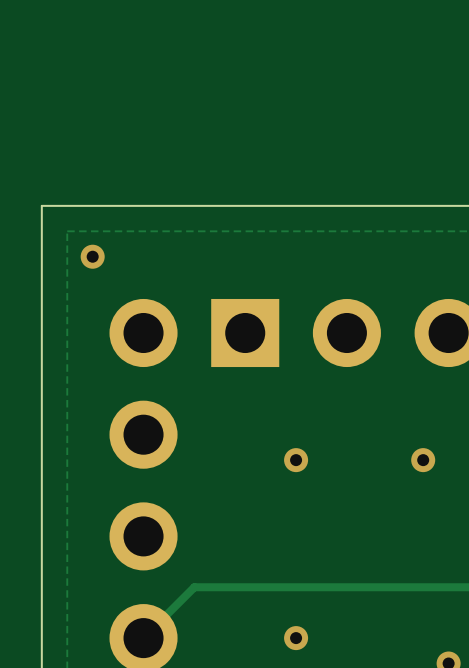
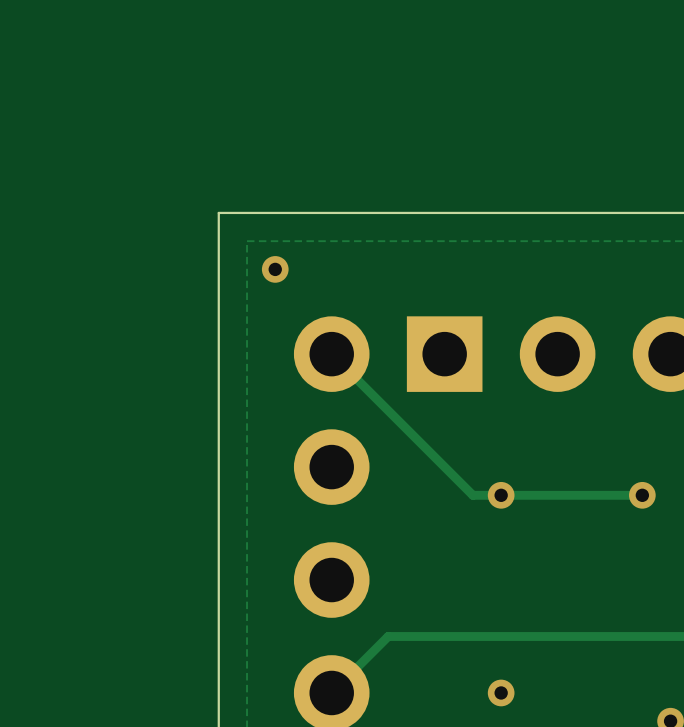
track: none -> (331, 354) (472, 495) (642, 495)

